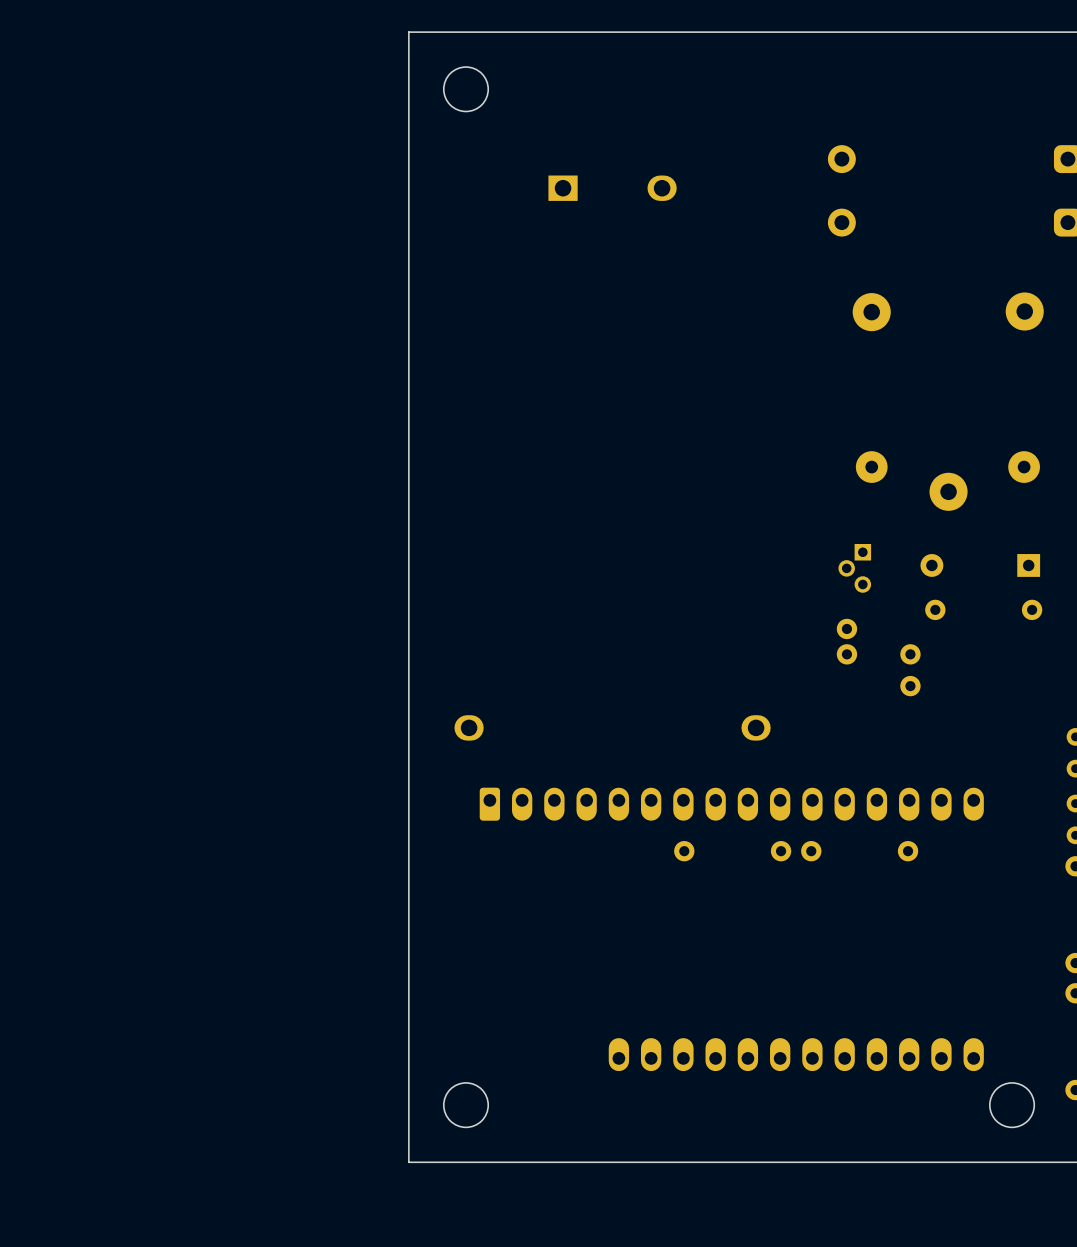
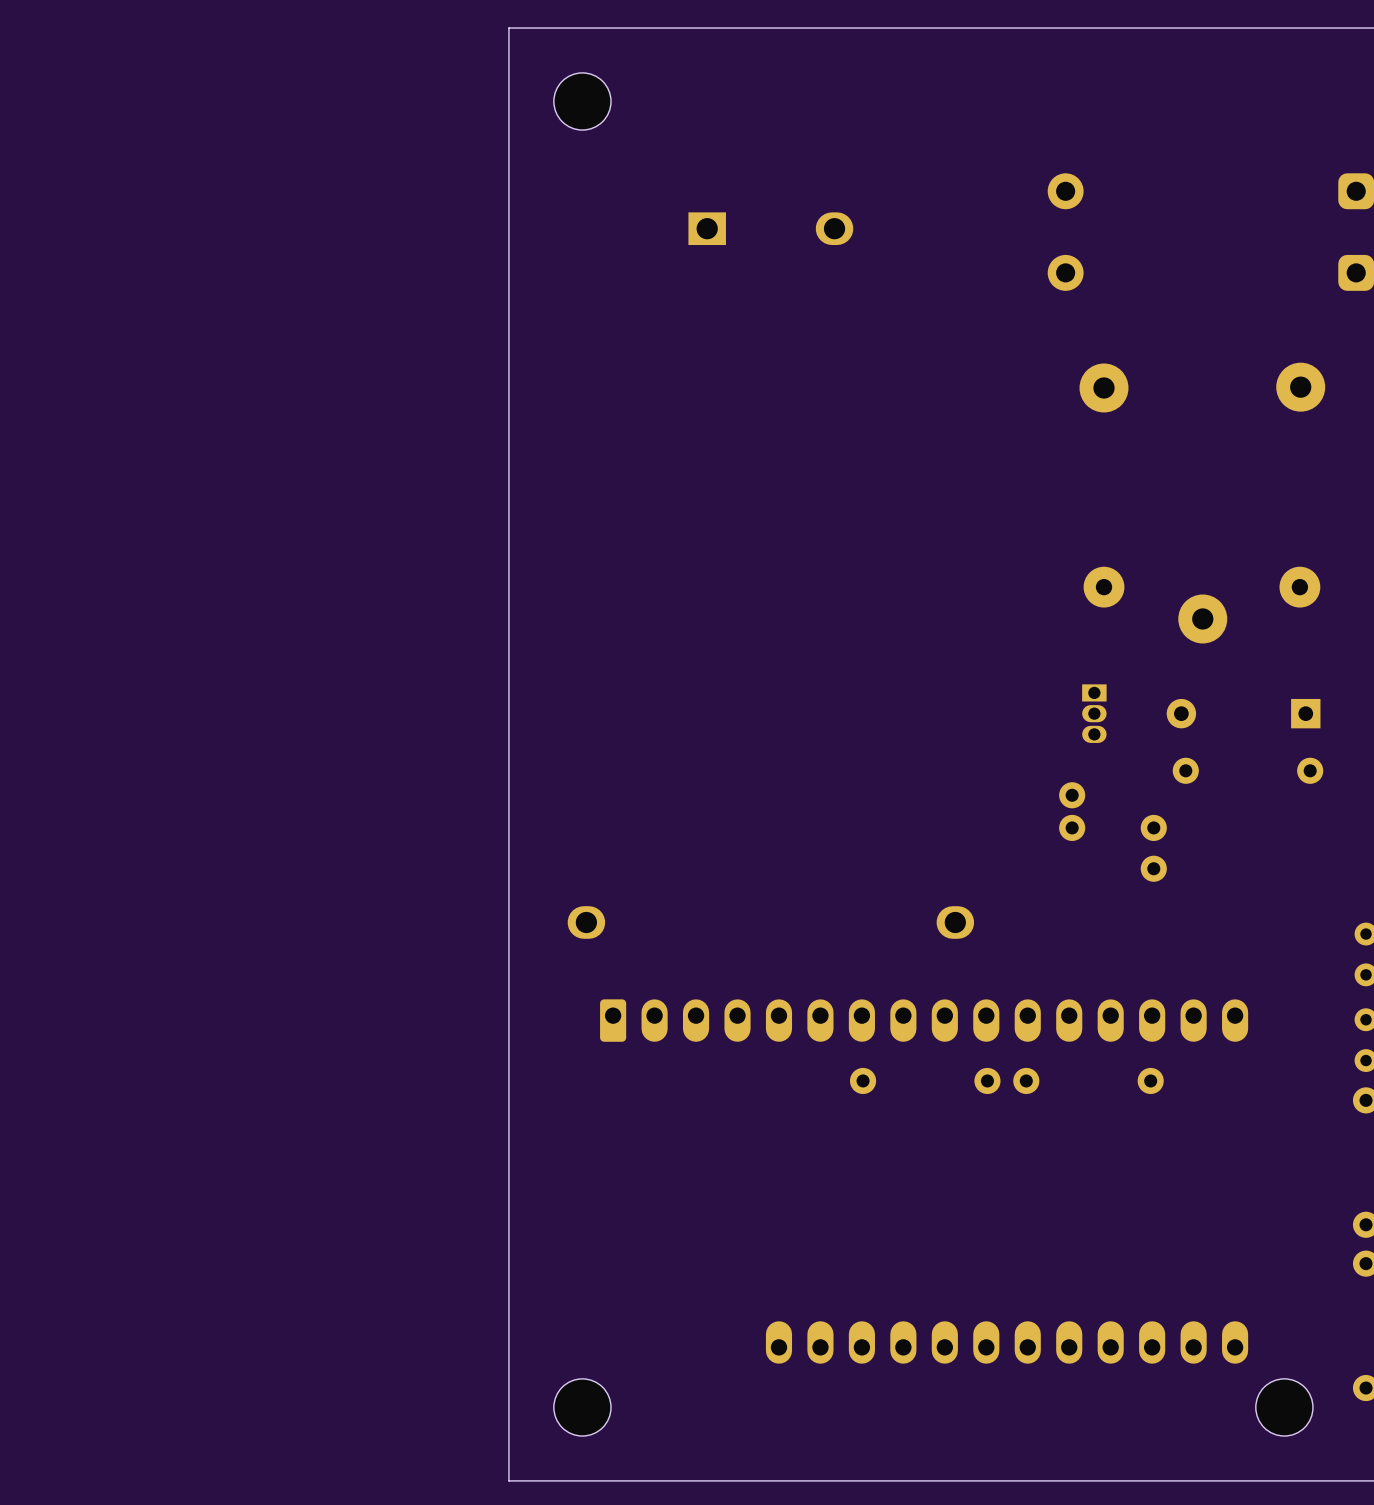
part footprint: [838, 544, 872, 593] -> [1082, 684, 1107, 743]

